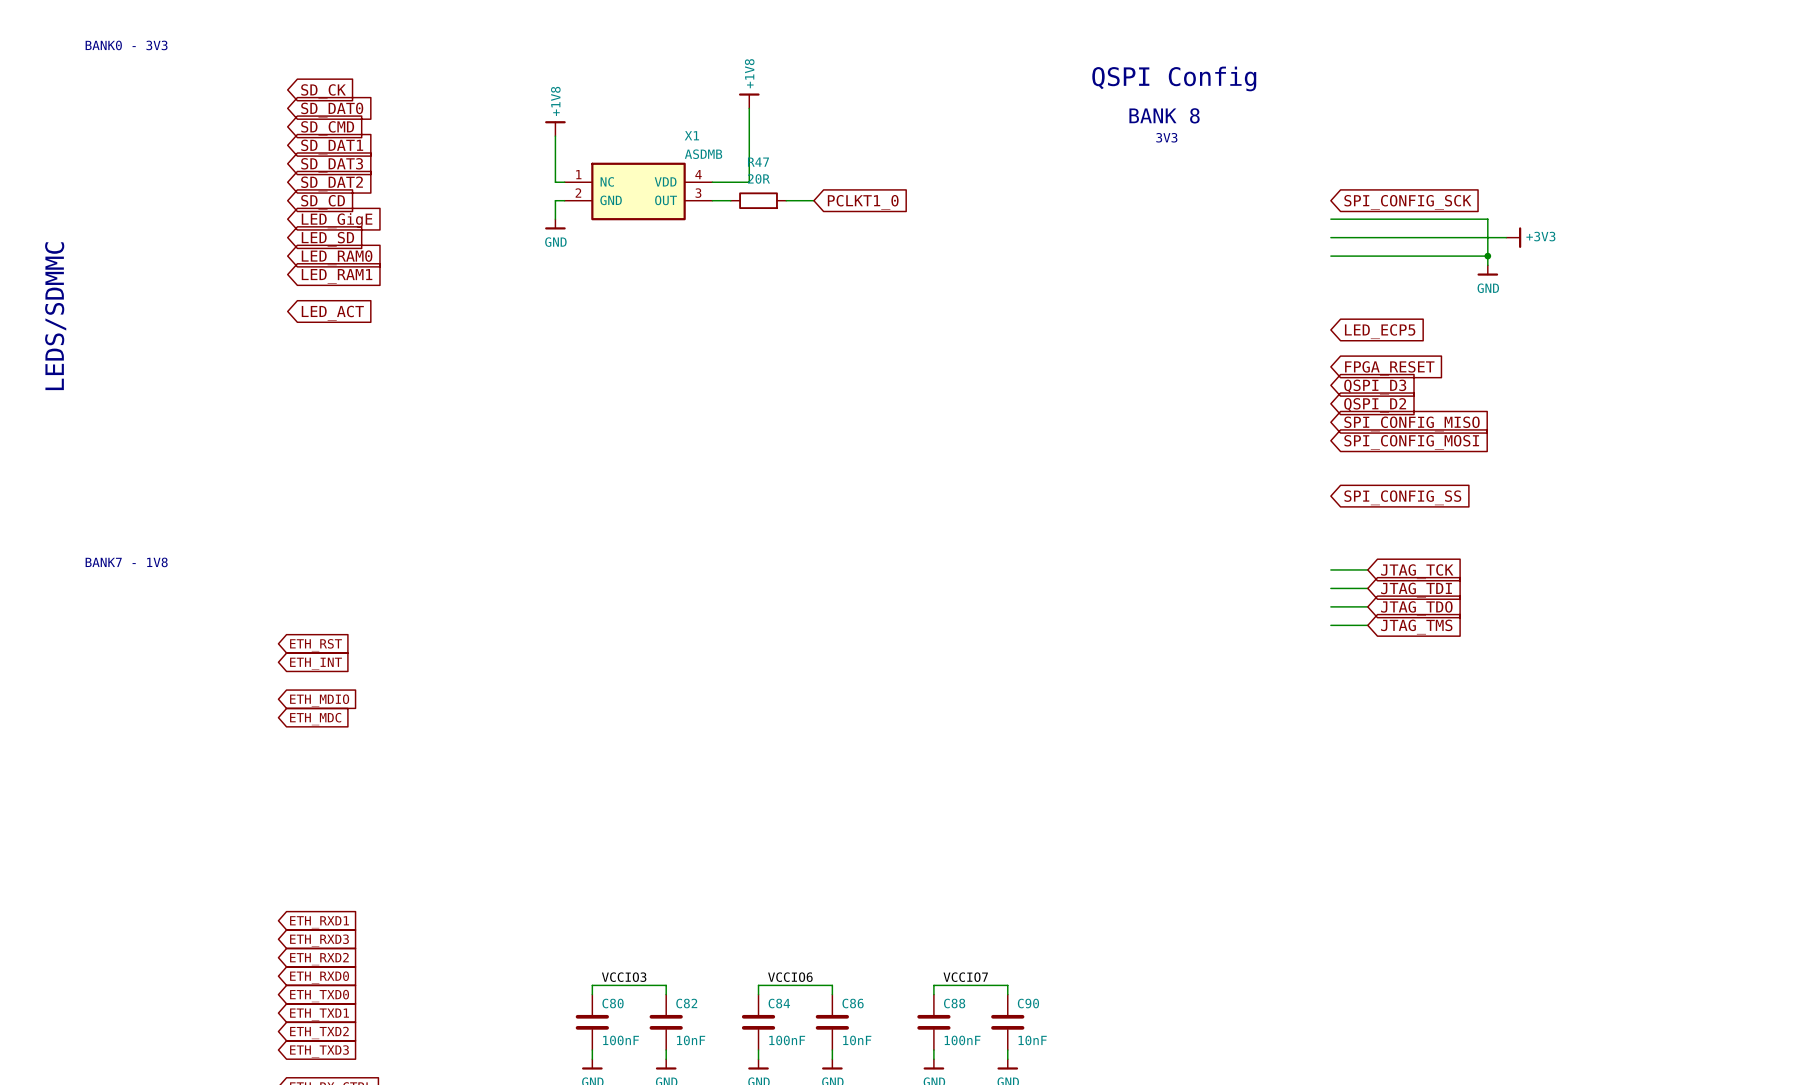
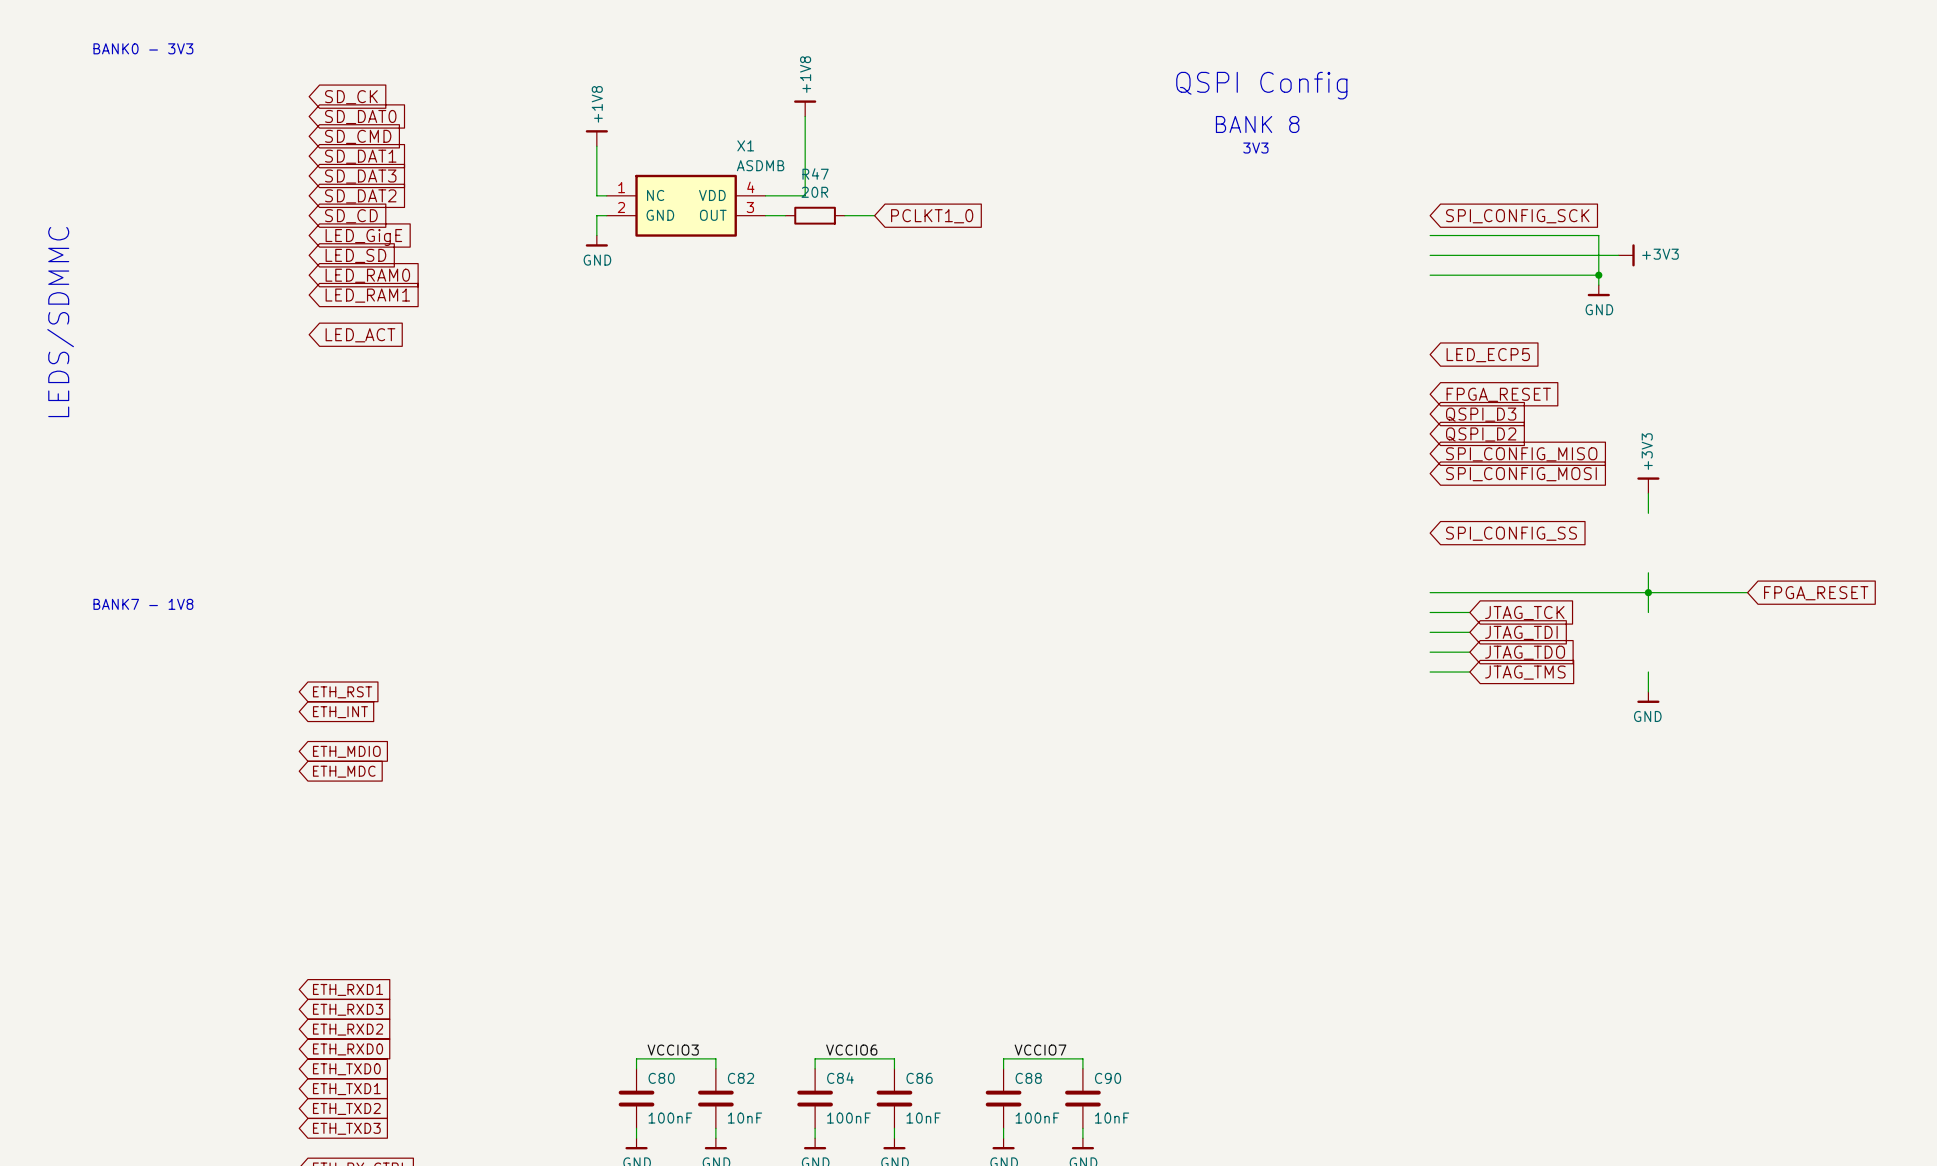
power symbol: none -> +3V3 (1648, 485)
wire: none -> (1648, 493) (1648, 513)
wire: none -> (1648, 572) (1648, 612)
wire: none -> (1430, 592) (1747, 592)
junction: none -> (1648, 592)
global label: none -> FPGA_RESET (1816, 593)
wire: none -> (1648, 672) (1648, 691)
power symbol: none -> GND (1648, 697)

